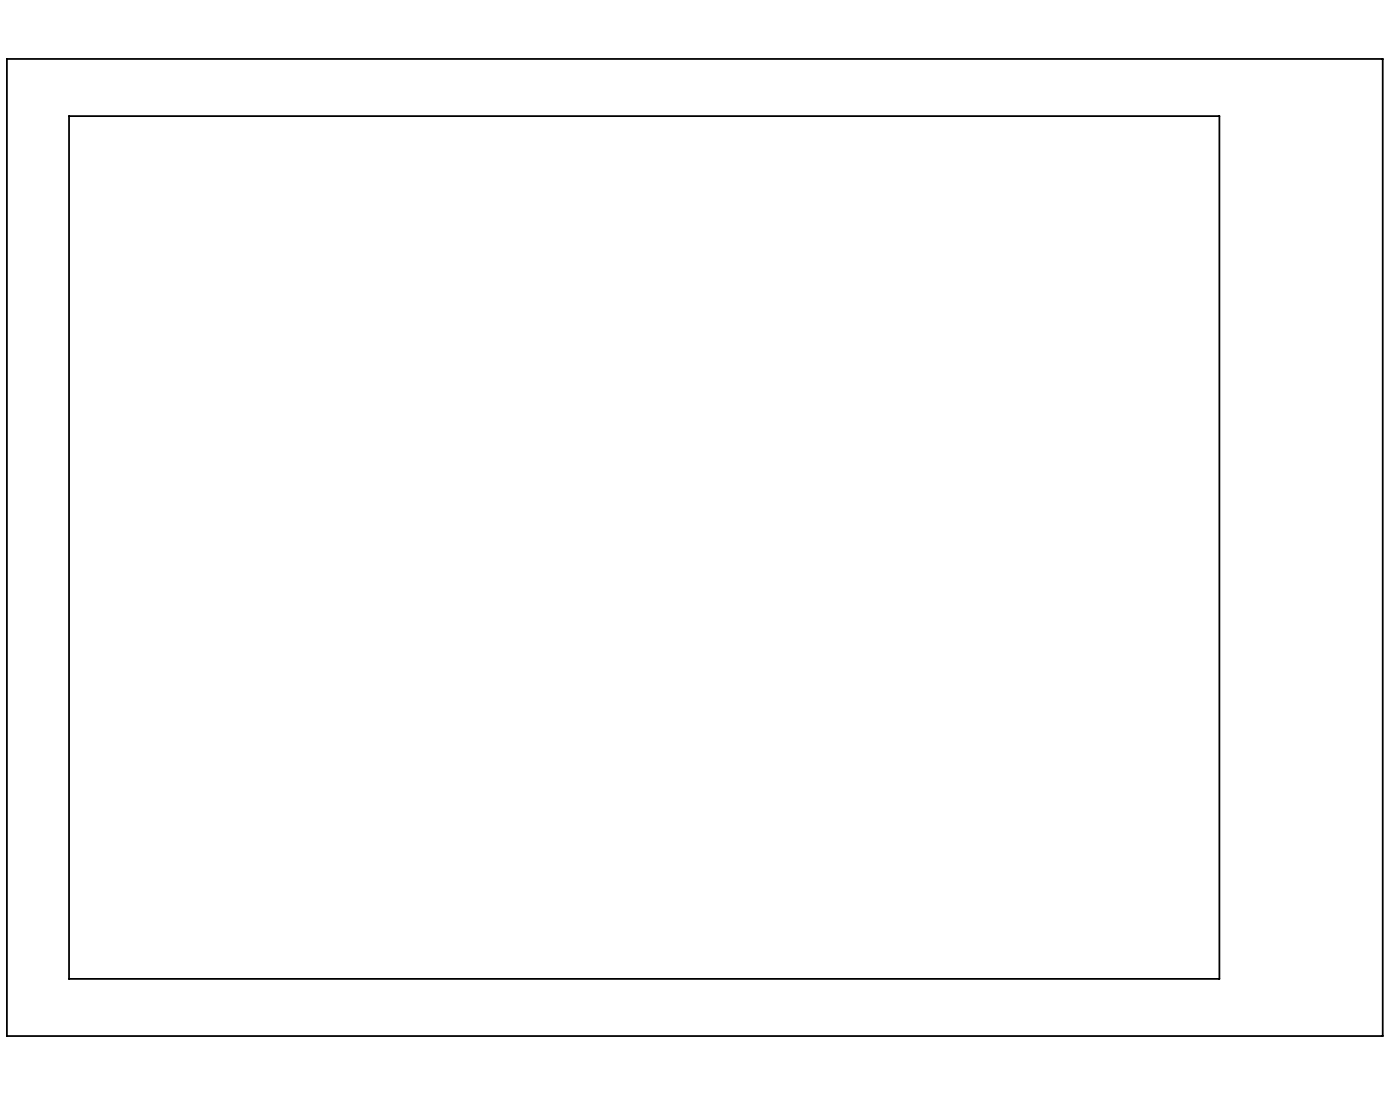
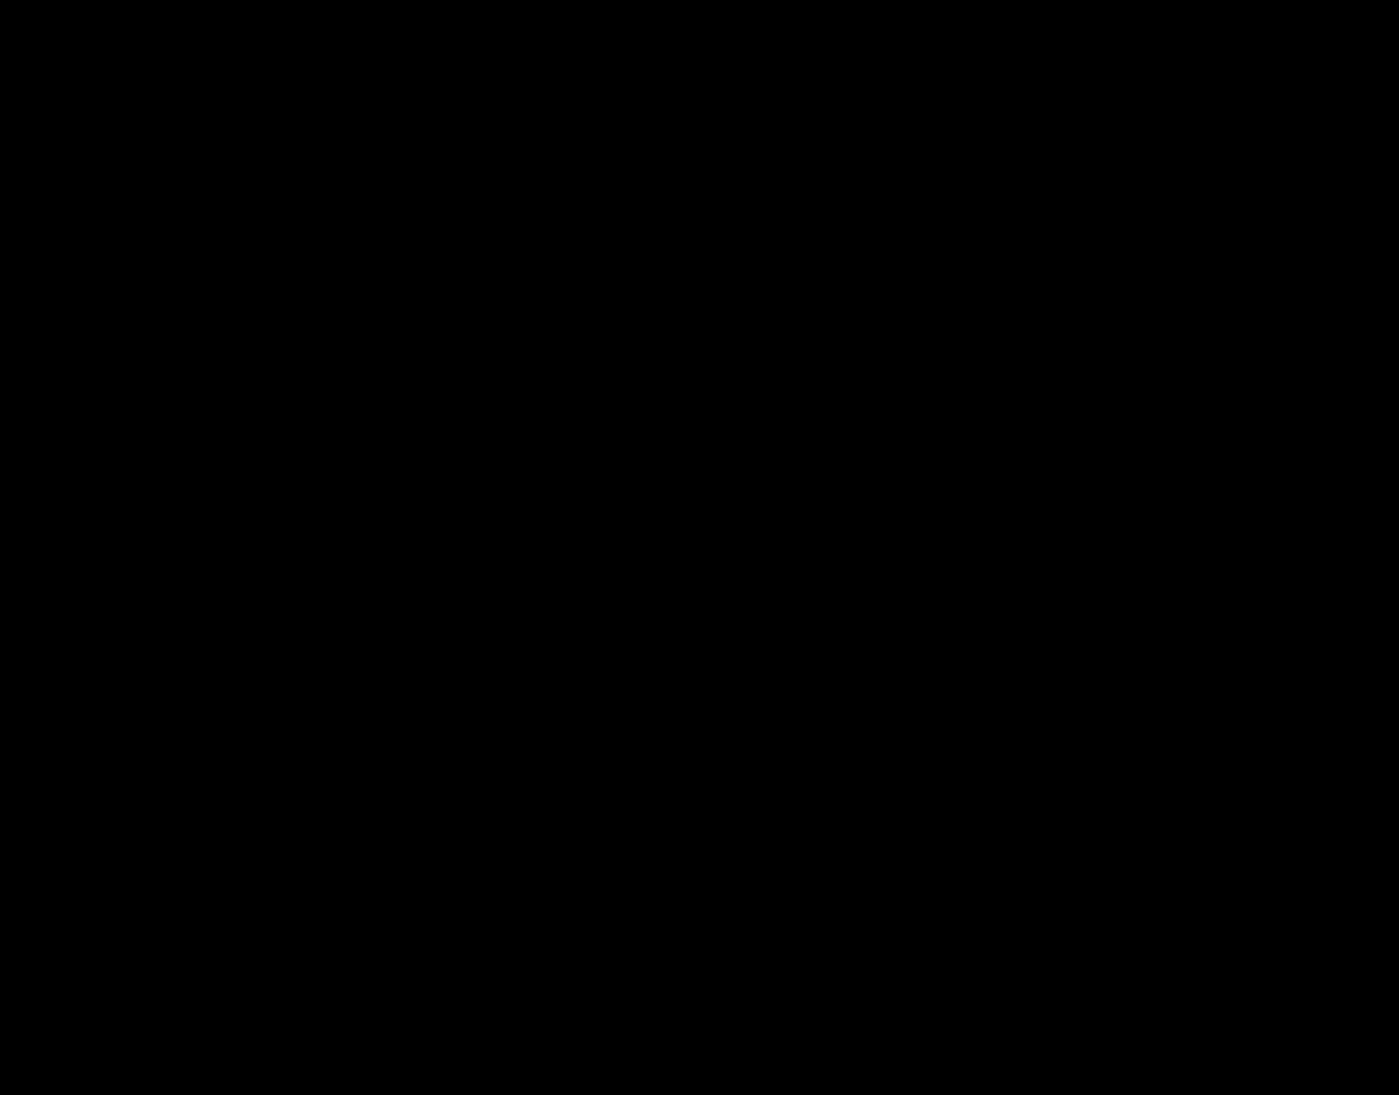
line: (6, 58) (1382, 58) (1382, 1036) (6, 1036) (6, 58) -> none
line: (69, 116) (1219, 116) (1219, 978) (69, 978) (69, 116) -> none

